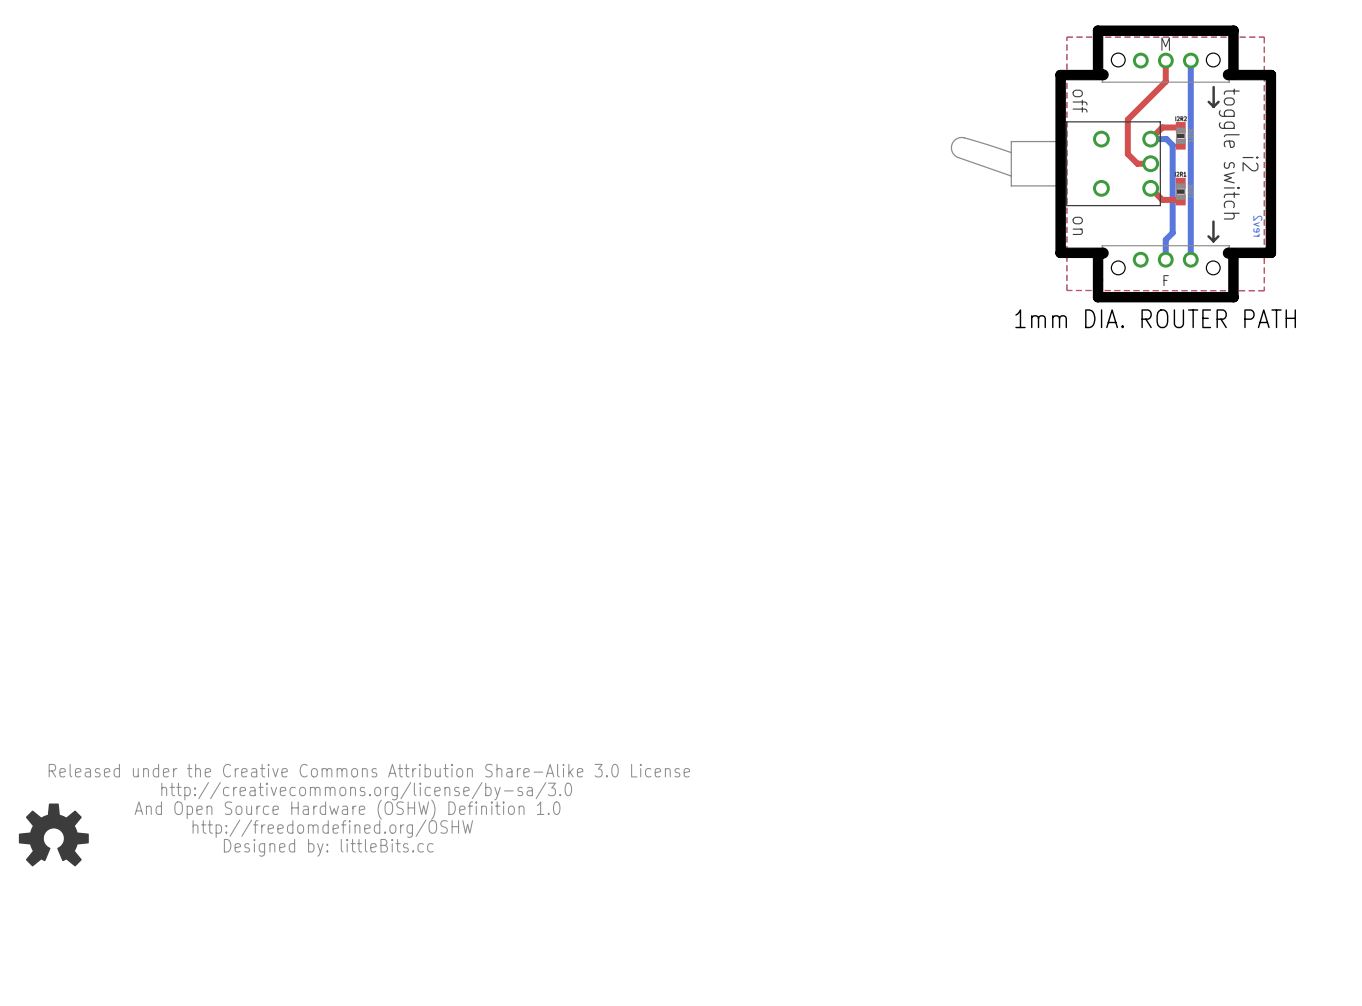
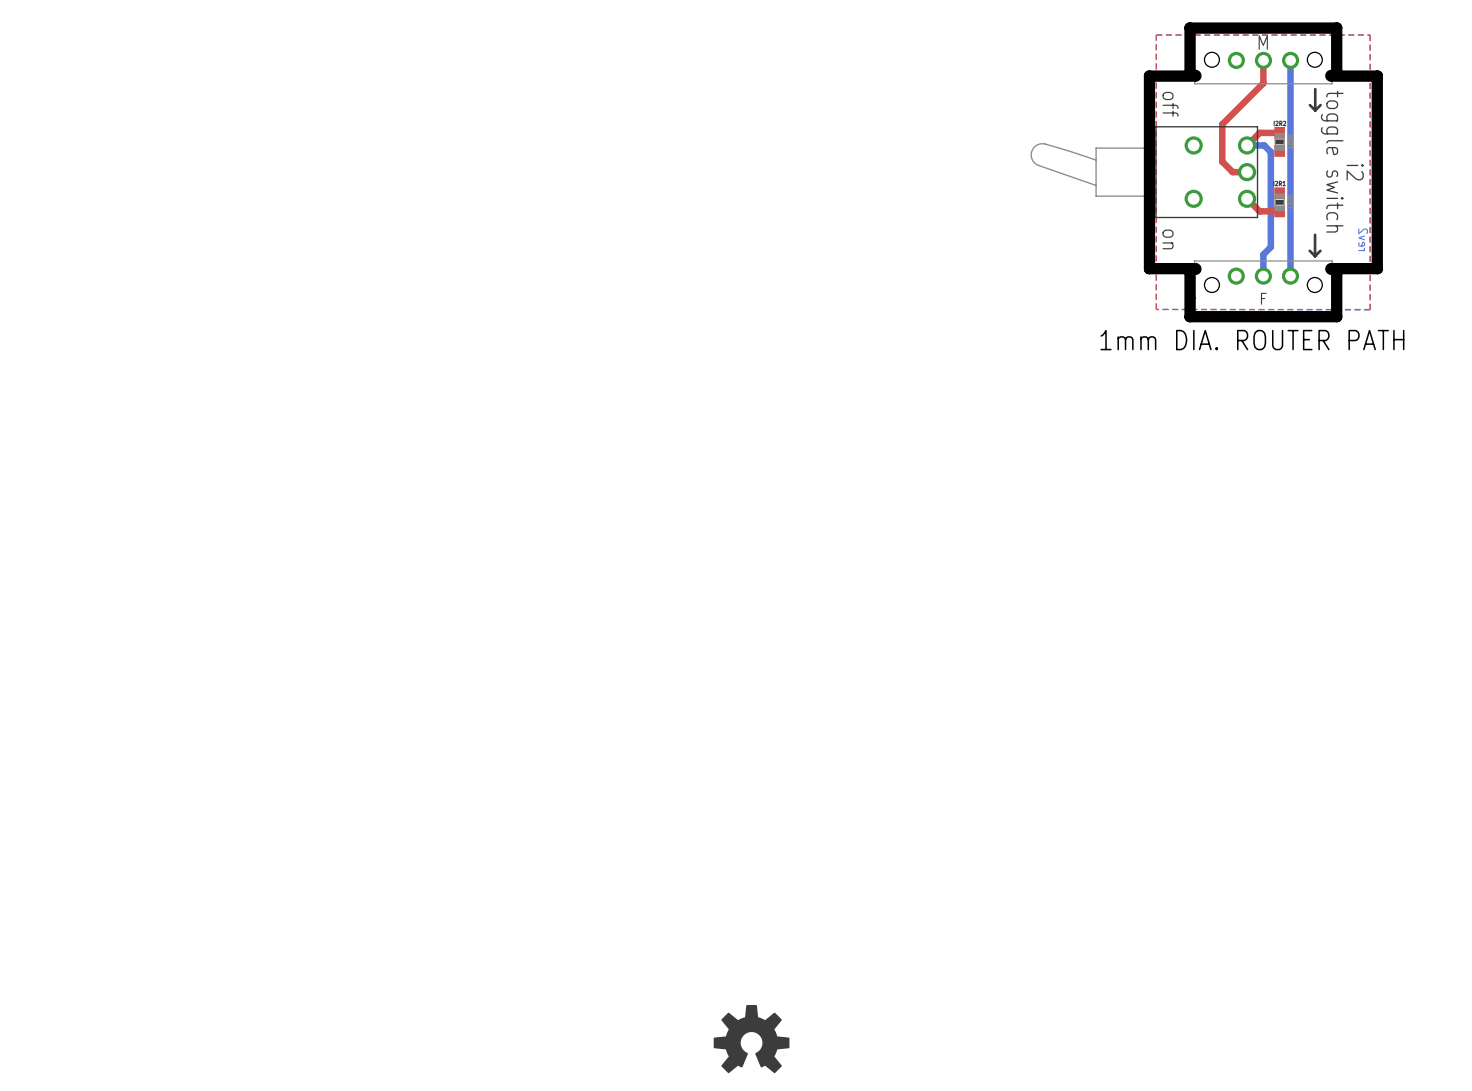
drawing: [18, 803, 89, 867] -> none
drawing: none -> [713, 1005, 790, 1074]

